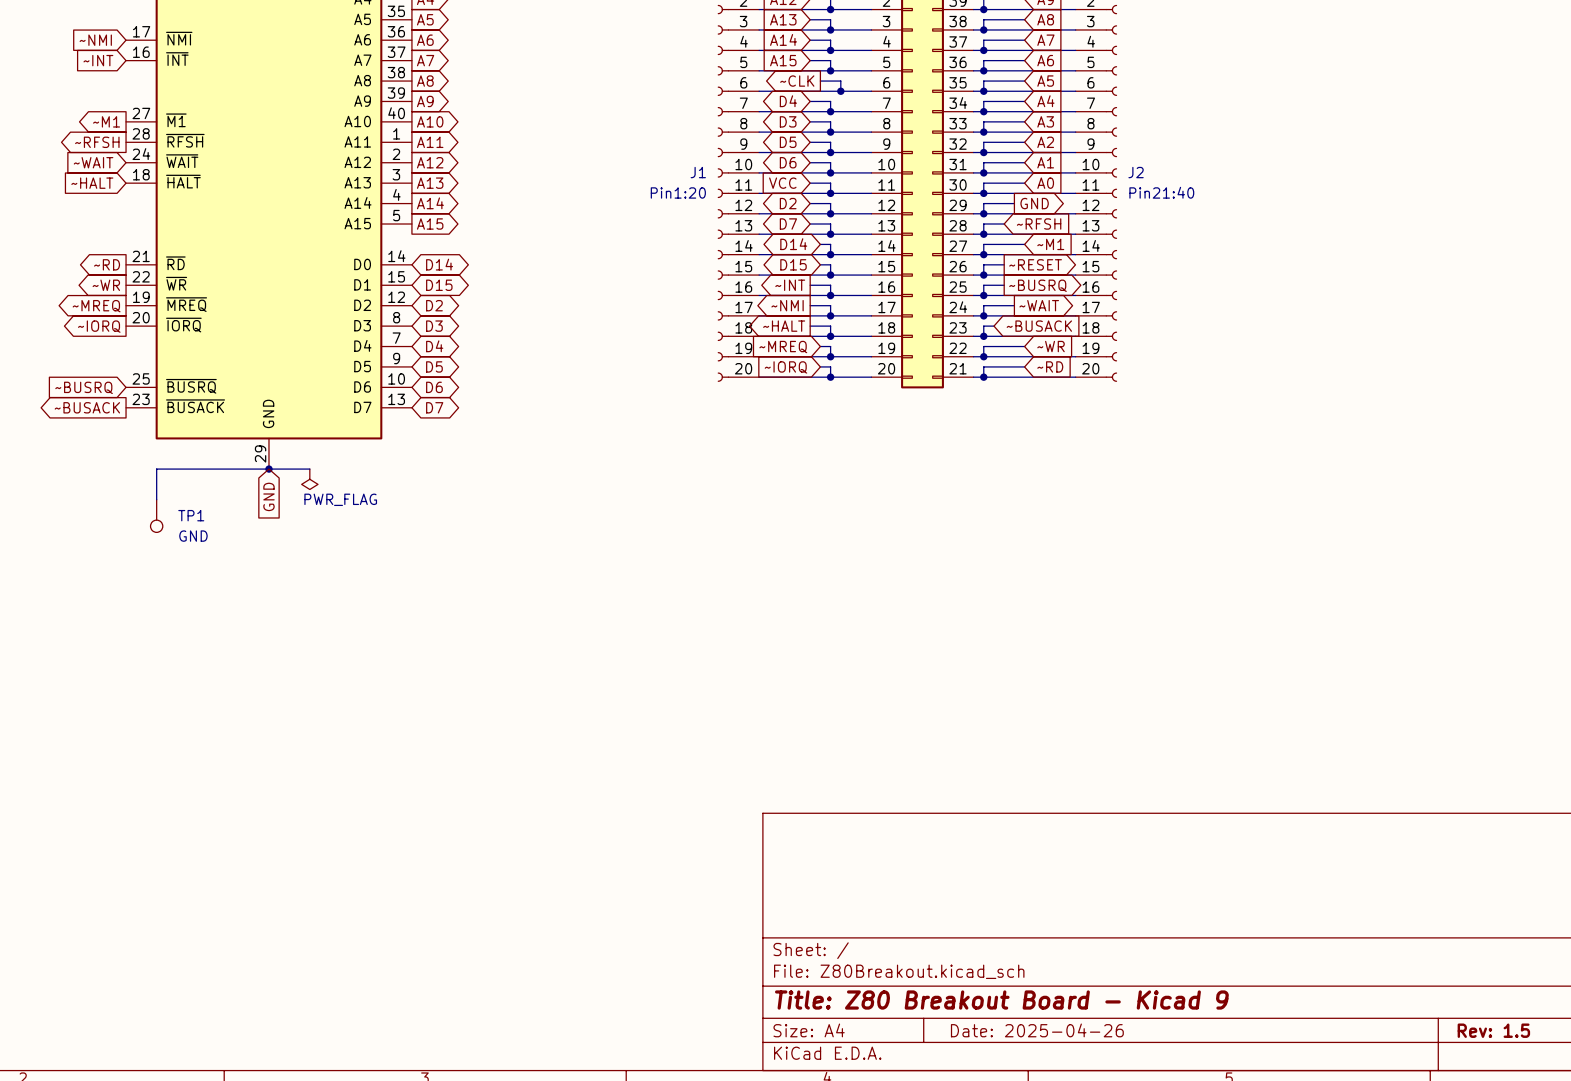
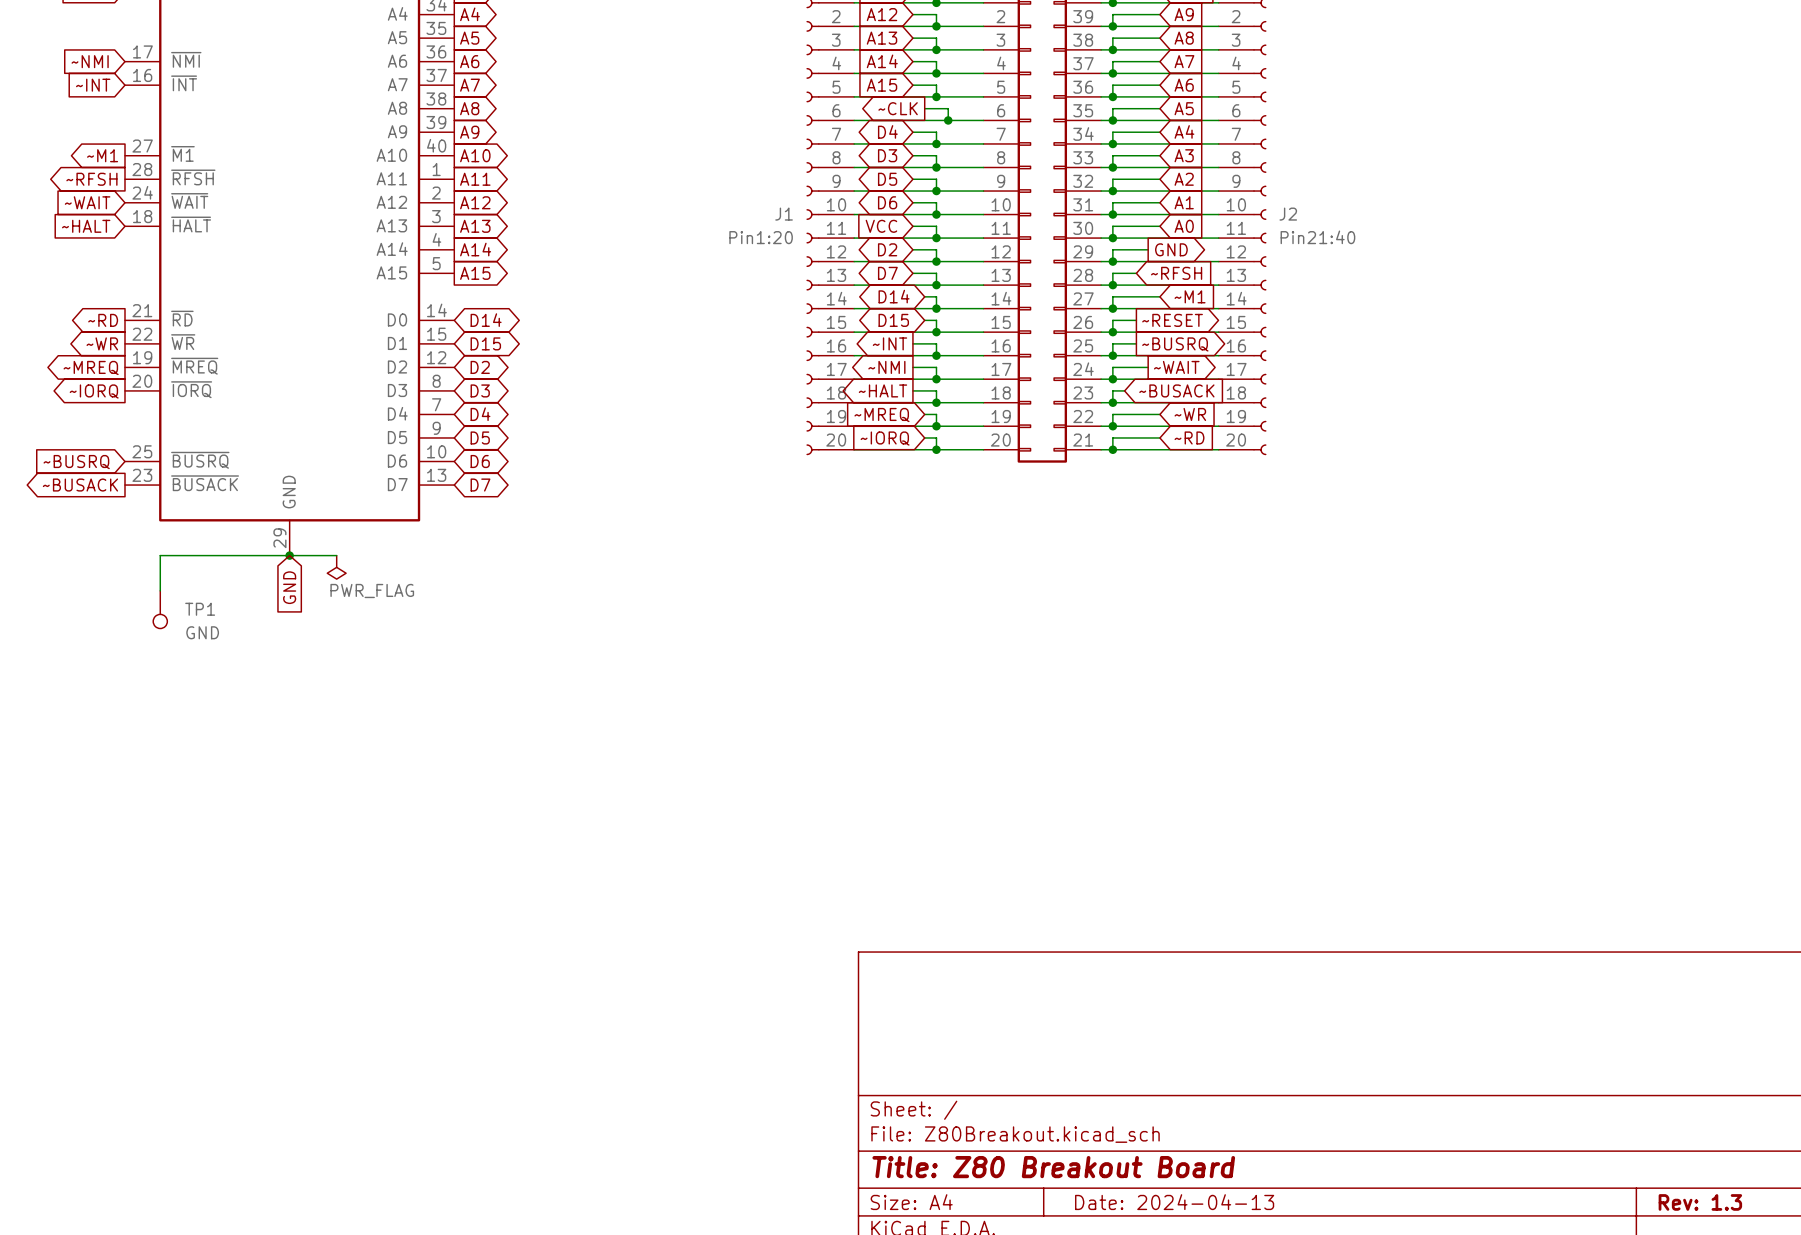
title block: Title: Z80 Breakout Board - Kicad 9 (1001, 1000) -> Title: Z80 Breakout Board (1053, 1167)
title block: Date: 2025-04-26 (1037, 1030) -> Date: 2024-04-13 (1174, 1202)
title block: Rev: 1.5 (1493, 1030) -> Rev: 1.3 (1700, 1202)

